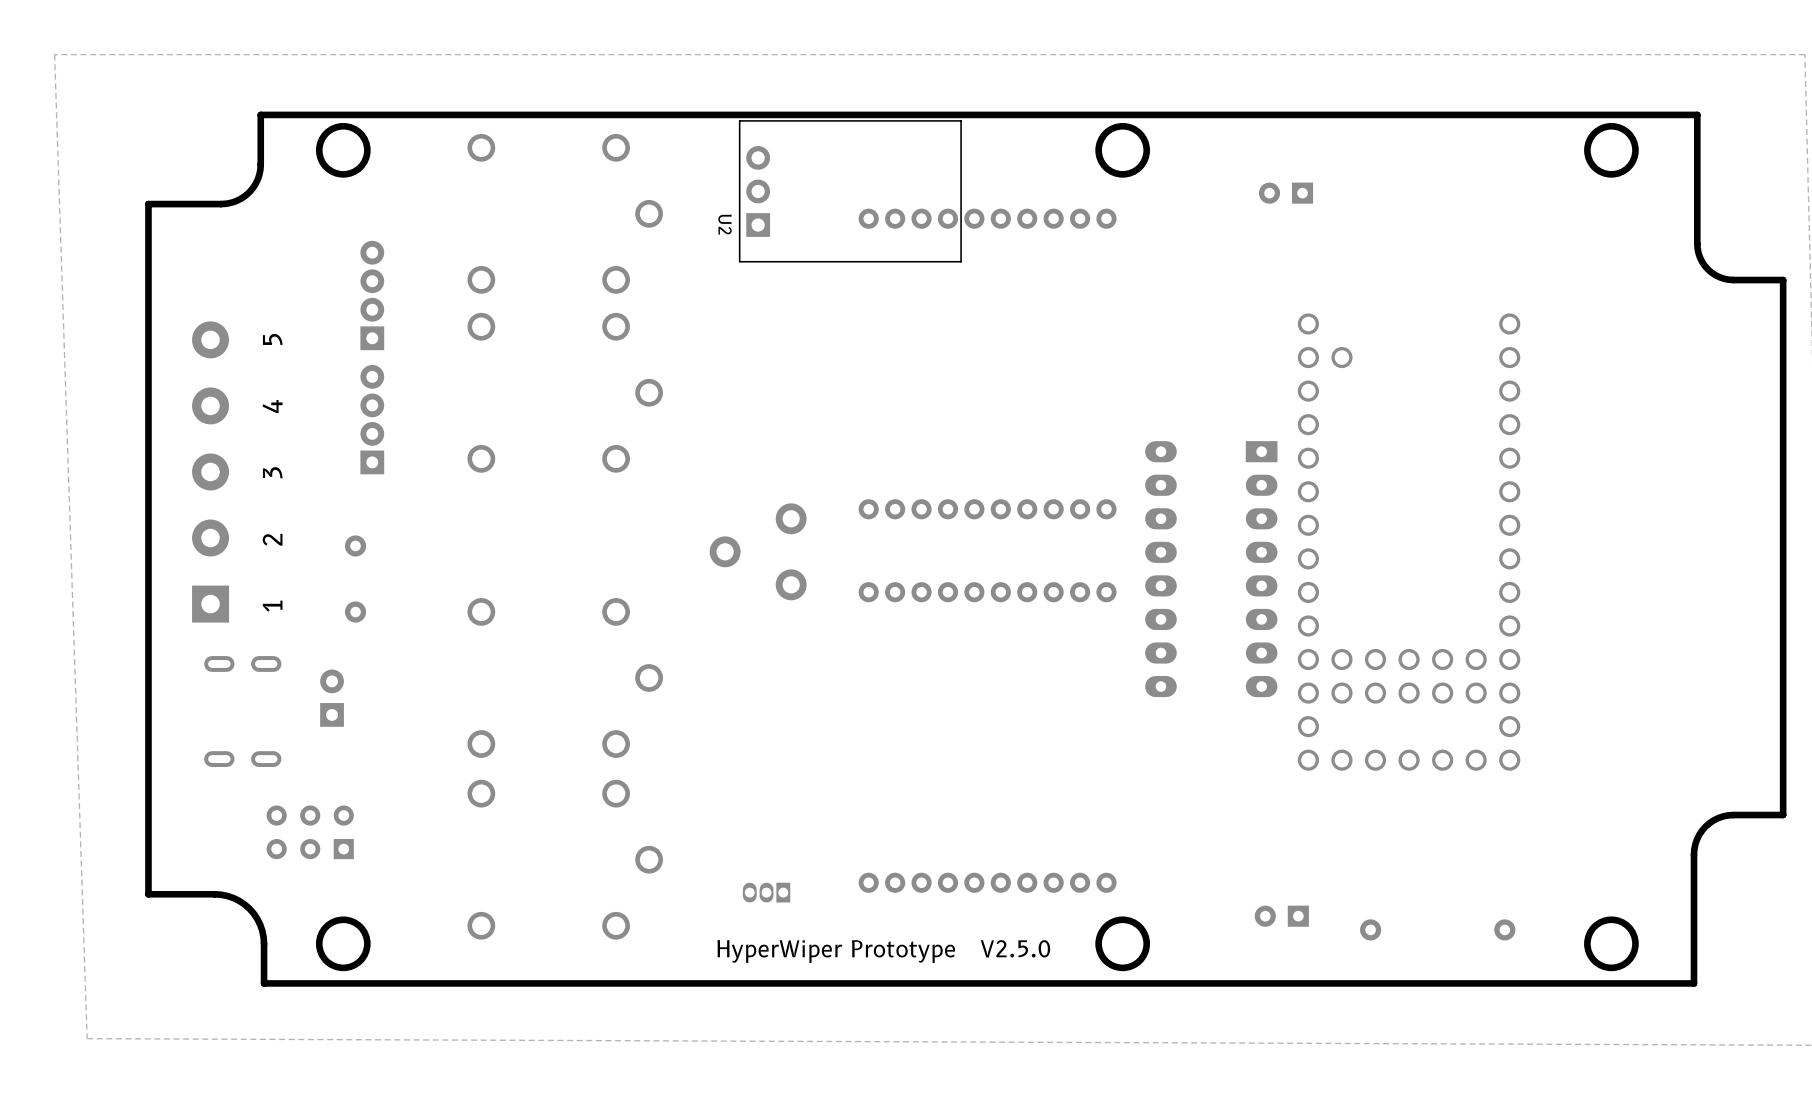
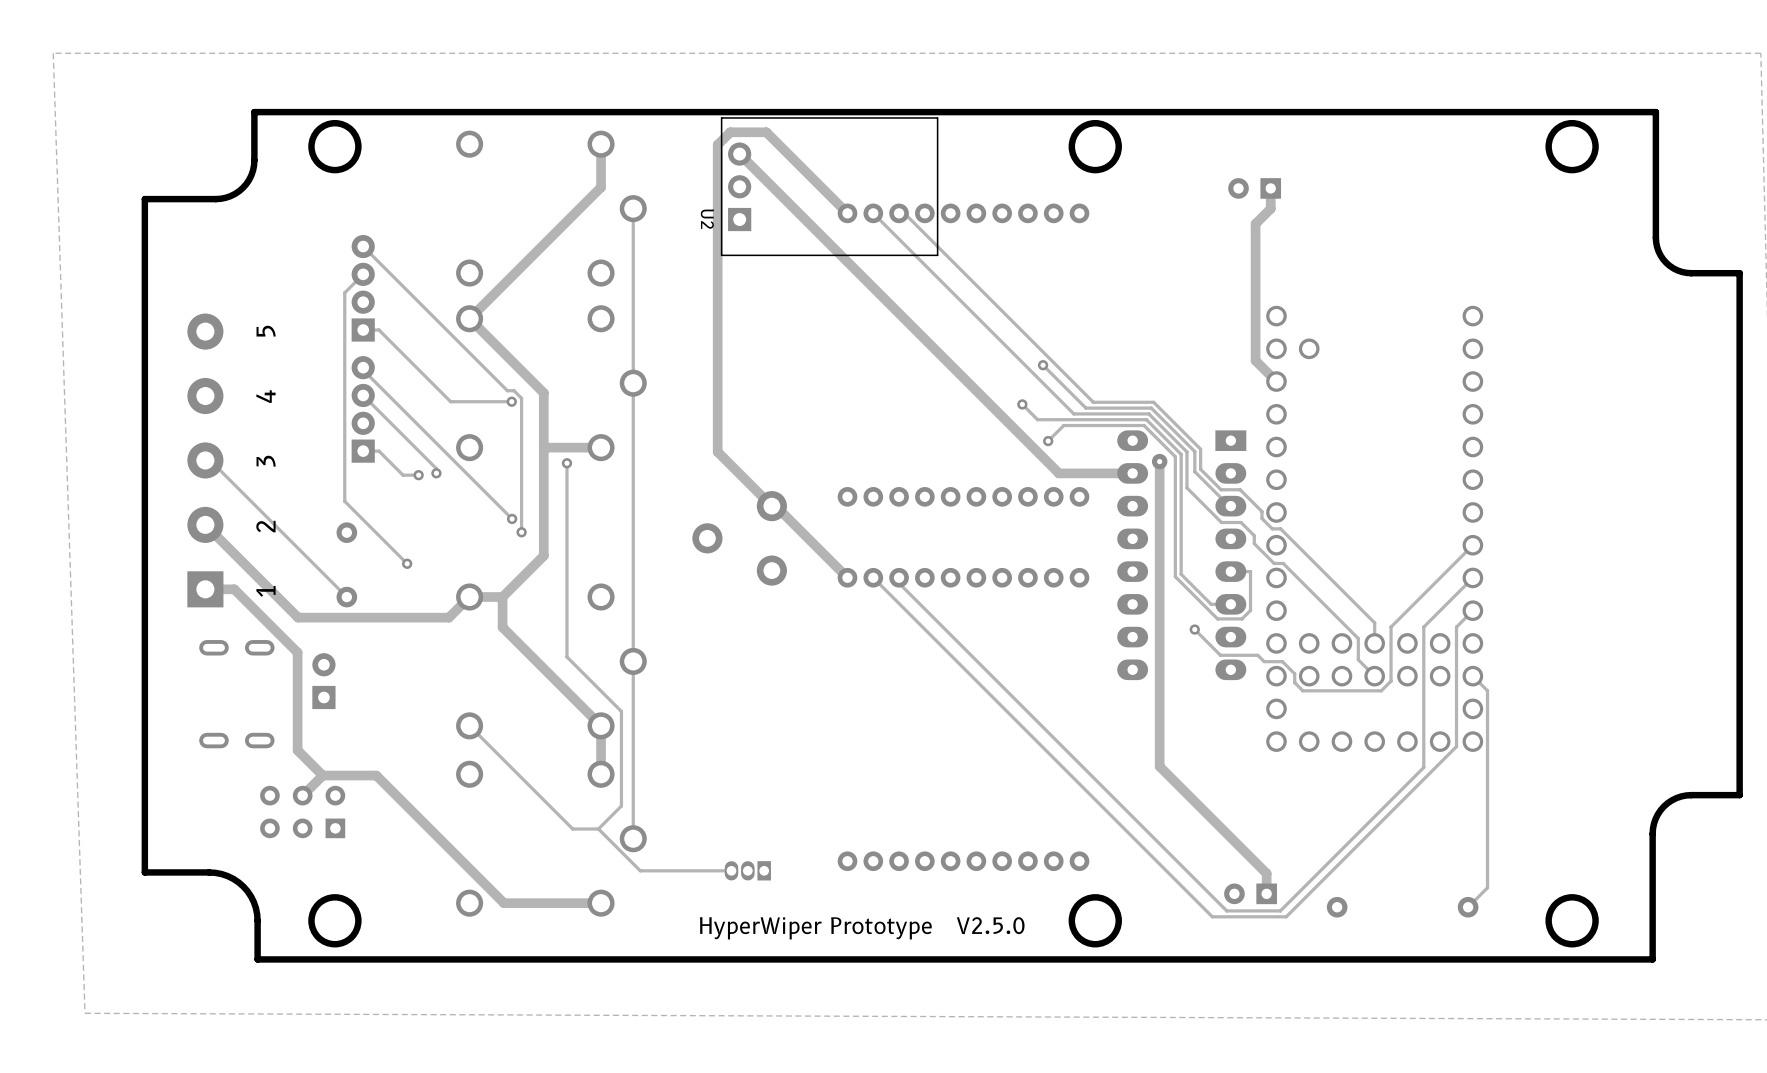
track: none -> (601, 144) (601, 187) (469, 318) (543, 392) (543, 555) (502, 596)
track: none -> (739, 154) (1059, 473) (1132, 473)
track: none -> (1270, 188) (1270, 208) (1255, 223) (1255, 360) (1276, 381)
track: none -> (633, 208) (633, 838)
track: none -> (847, 213) (766, 132) (730, 132) (717, 144) (717, 451) (771, 506) (775, 506) (847, 577)
track: none -> (873, 213) (1073, 413) (1148, 413) (1186, 451) (1186, 487) (1221, 522) (1241, 522) (1254, 535) (1254, 543) (1274, 563) (1283, 563) (1358, 638) (1358, 659) (1374, 676)
track: none -> (899, 213) (904, 213) (1093, 402) (1153, 402) (1200, 449) (1200, 469) (1221, 489) (1240, 489) (1261, 511) (1261, 518) (1272, 528) (1280, 528) (1374, 622) (1374, 643)
track: none -> (363, 246) (507, 390) (514, 390) (521, 398) (521, 532)
track: none -> (363, 274) (344, 292) (344, 501) (407, 563)
track: none -> (363, 330) (379, 330) (450, 401) (511, 401)
track: none -> (1043, 365) (1085, 408) (1151, 408) (1194, 451) (1194, 471) (1230, 506)
via: none -> (1043, 365)
track: none -> (363, 367) (363, 370) (512, 518)
track: none -> (363, 395) (436, 468) (436, 473)
via: none -> (511, 401)
track: none -> (1022, 404) (1037, 419) (1146, 419) (1181, 454) (1181, 574) (1211, 604) (1230, 604)
via: none -> (1022, 404)
track: none -> (1048, 441) (1063, 425) (1144, 425) (1175, 456) (1175, 576) (1217, 618) (1242, 618) (1250, 610) (1250, 571) (1230, 571)
via: none -> (1048, 441)
track: none -> (601, 447) (543, 447)
track: none -> (363, 451) (379, 451) (403, 475) (418, 475)
track: none -> (205, 460) (210, 460) (346, 597)
track: none -> (1159, 461) (1159, 766) (1266, 873) (1266, 893)
via: none -> (1159, 461)
track: none -> (566, 463) (566, 656) (621, 711) (621, 806) (598, 829)
via: none -> (566, 463)
via: none -> (436, 473)
via: none -> (418, 475)
via: none -> (512, 518)
track: none -> (205, 524) (298, 617) (448, 617) (469, 596) (502, 596)
via: none -> (521, 532)
track: none -> (1472, 545) (1391, 627) (1391, 681) (1381, 690) (1302, 690) (1294, 682) (1294, 673) (1282, 661) (1264, 661) (1257, 655) (1220, 655) (1194, 629)
via: none -> (407, 563)
track: none -> (873, 577) (1212, 916) (1286, 916) (1456, 746) (1456, 627) (1472, 610)
track: none -> (899, 577) (899, 583) (1226, 910) (1280, 910) (1423, 767) (1423, 627) (1472, 577)
track: none -> (205, 589) (234, 589) (297, 652) (297, 750) (322, 775)
track: none -> (502, 596) (502, 627) (601, 725) (601, 774)
via: none -> (1194, 629)
track: none -> (1472, 676) (1487, 690) (1487, 887) (1468, 907)
track: none -> (469, 725) (572, 829) (598, 829)
track: none -> (322, 775) (302, 795)
track: none -> (322, 775) (376, 775) (504, 903) (601, 903)
track: none -> (598, 829) (640, 870) (731, 870)

